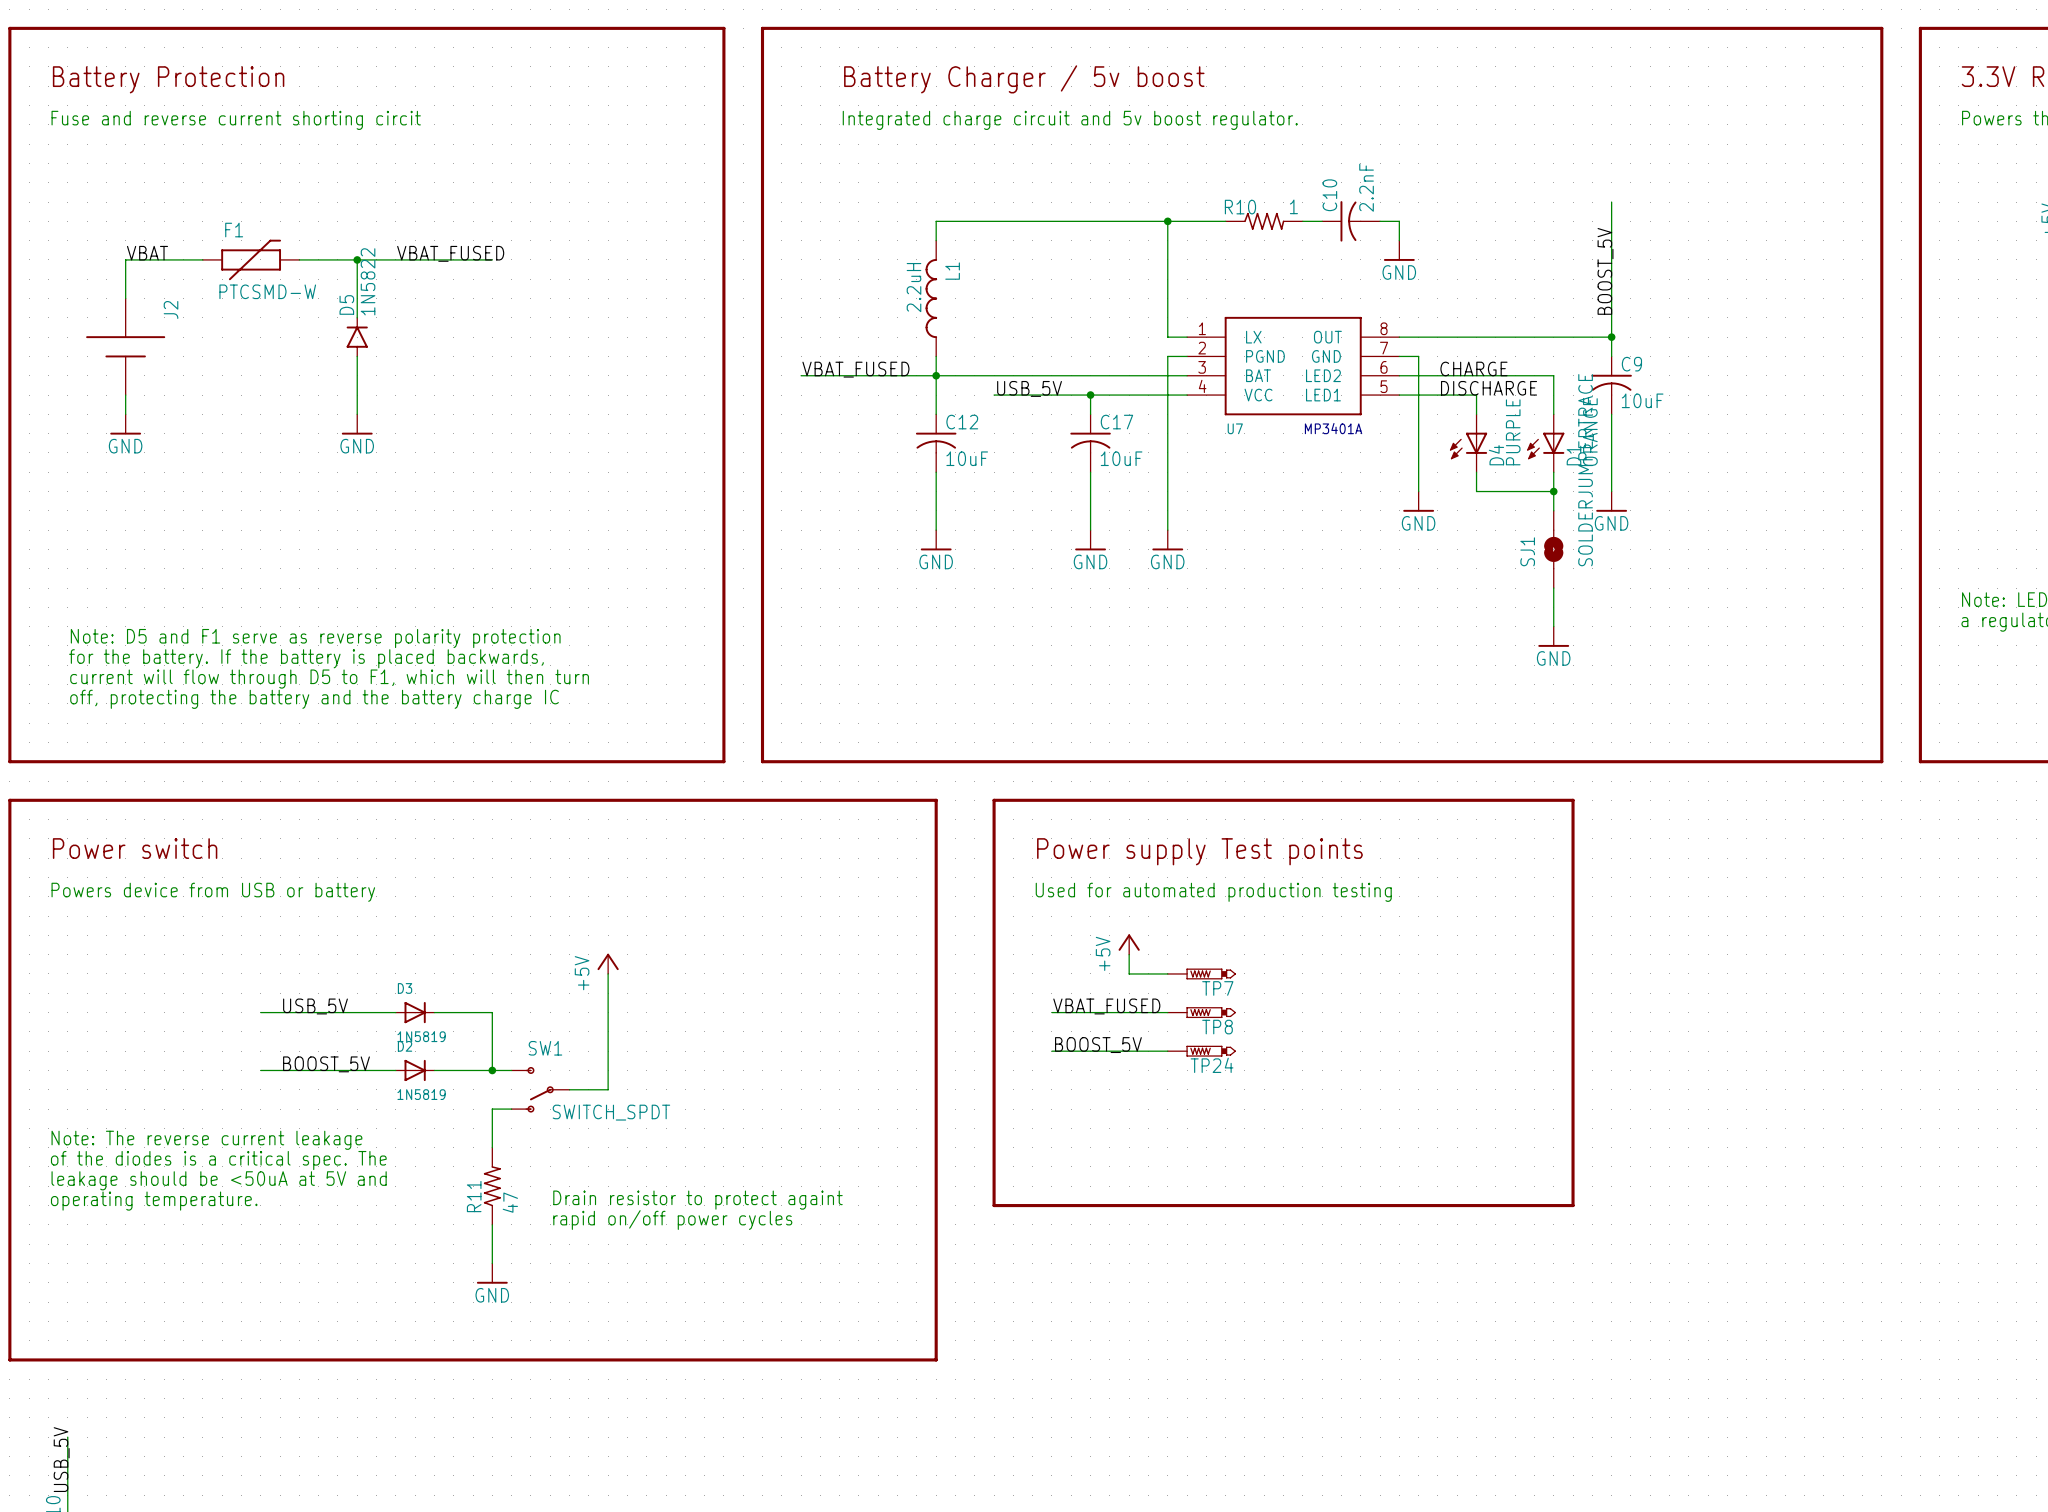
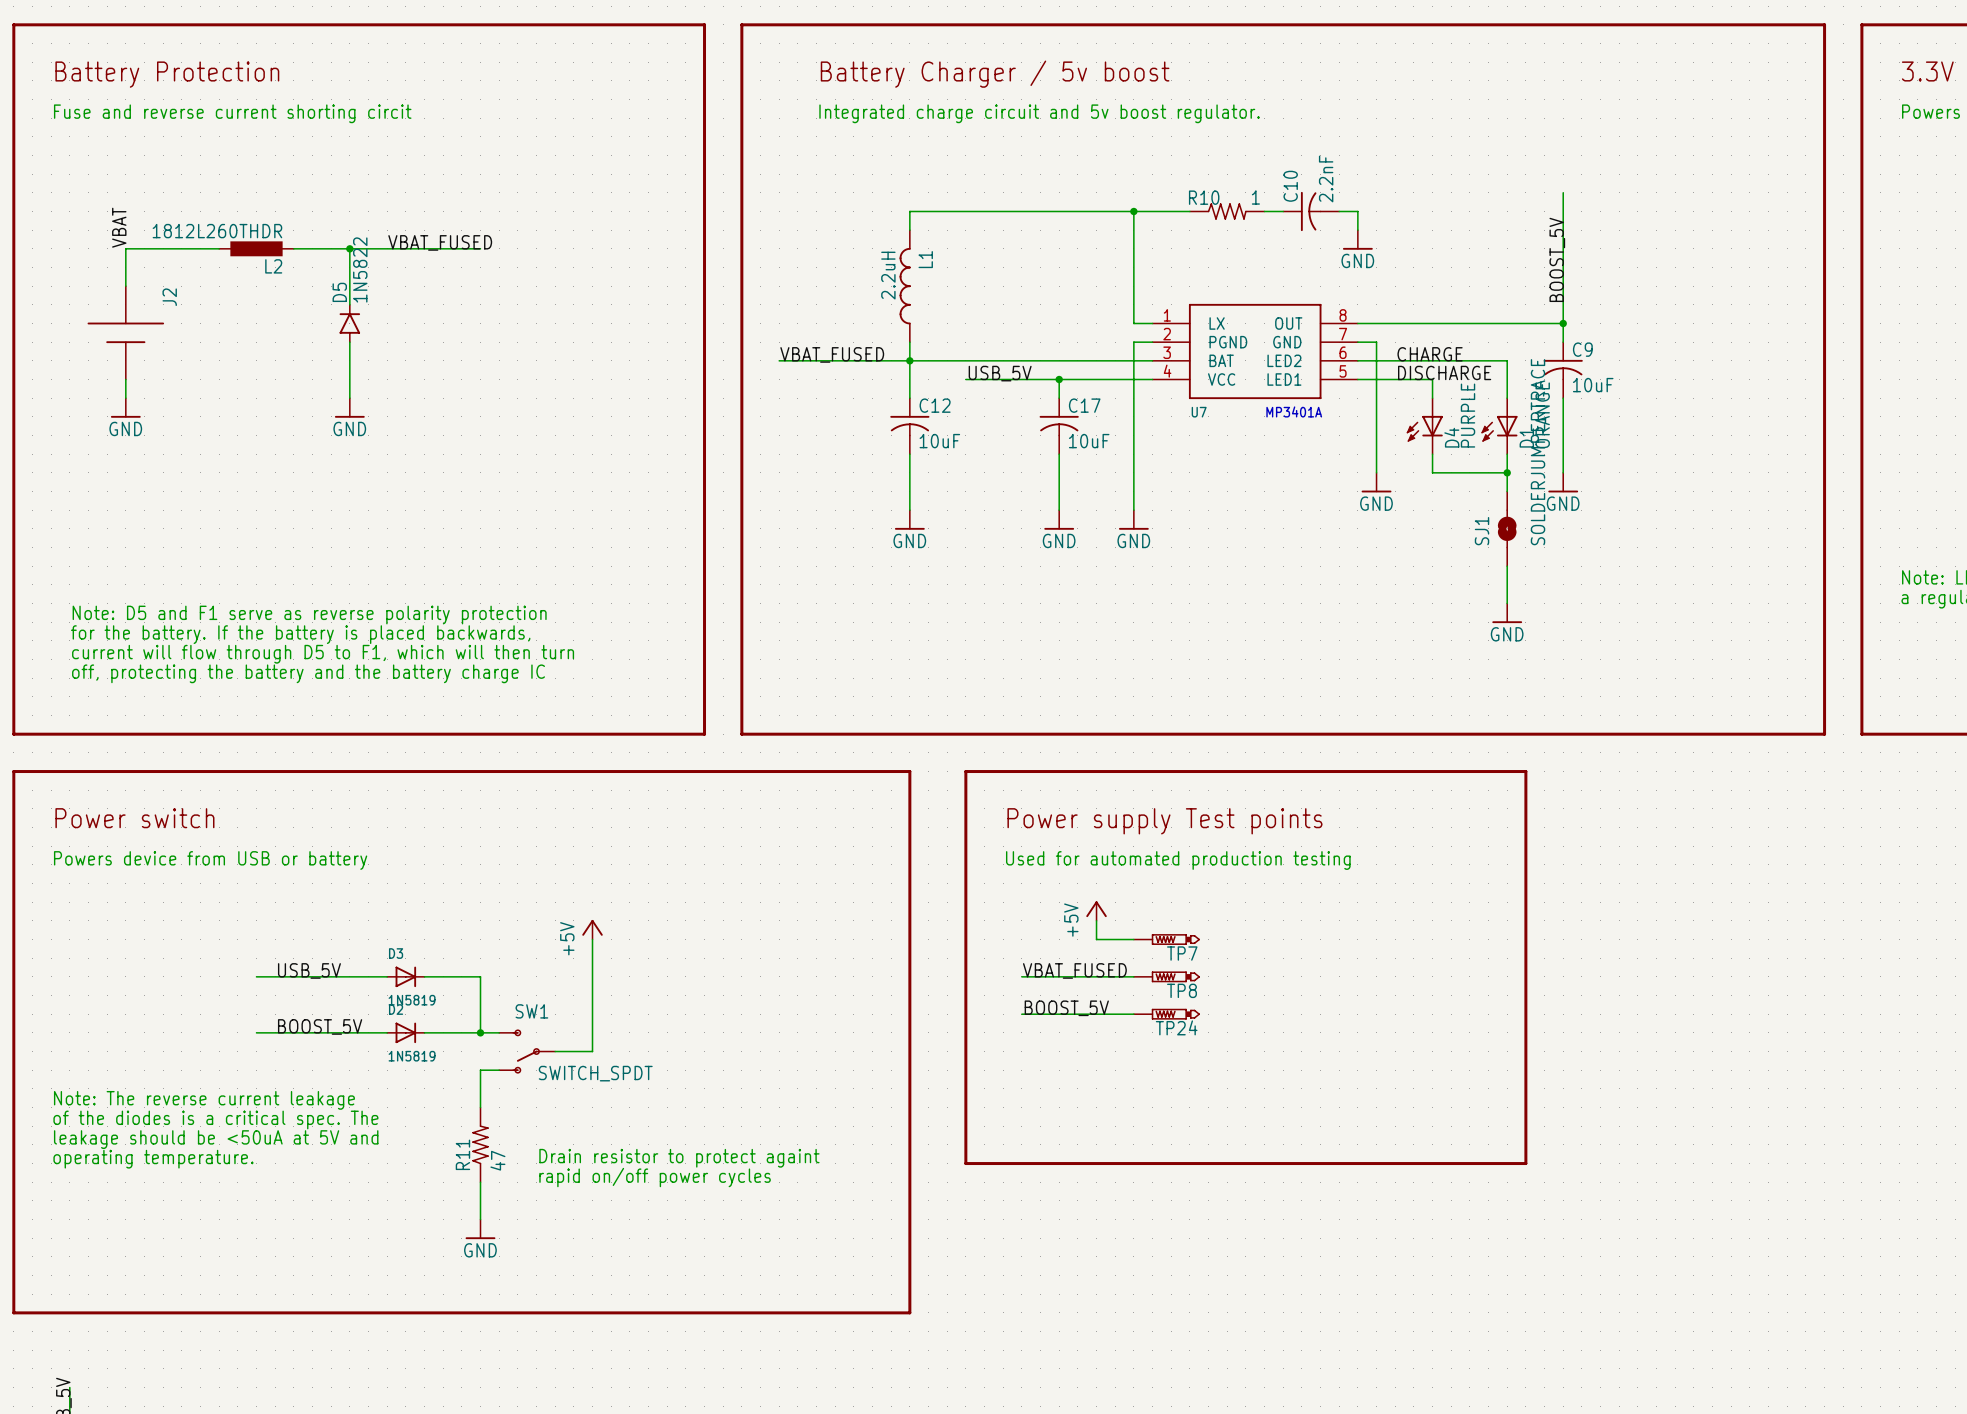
label rotation: 0° (147, 253) -> 90° counterclockwise (119, 227)
F1: PTCSMD-W (251, 259) -> none
L2: none -> 1812L260THDR (256, 248)

